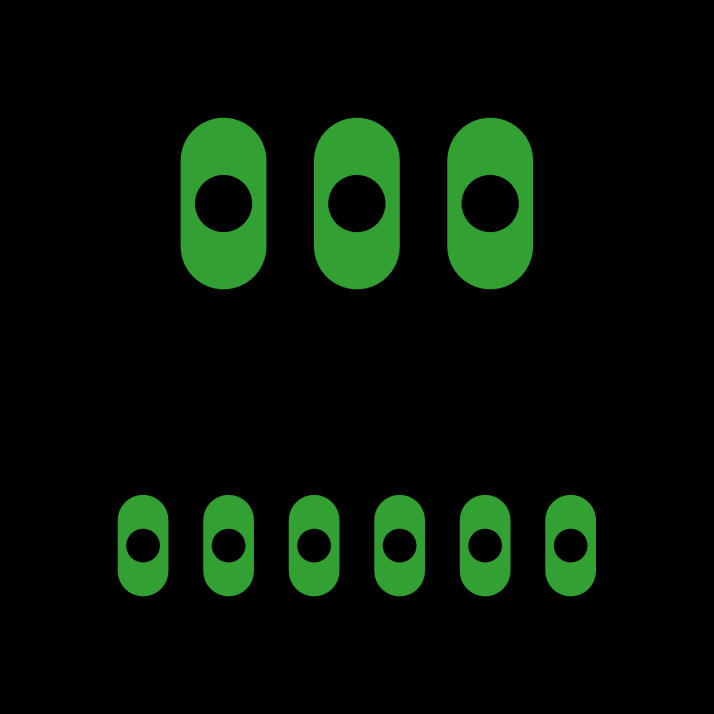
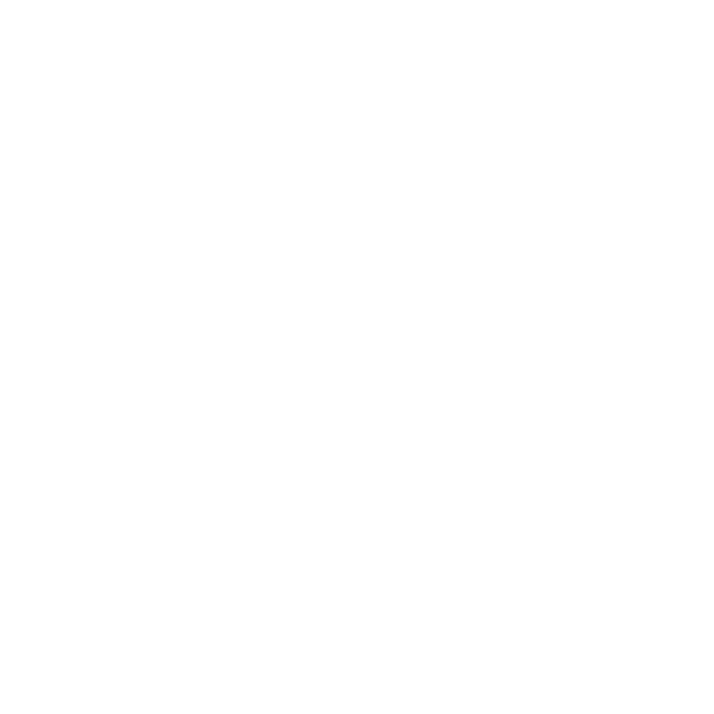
part: (356, 203) -> none
part: (356, 545) -> none

